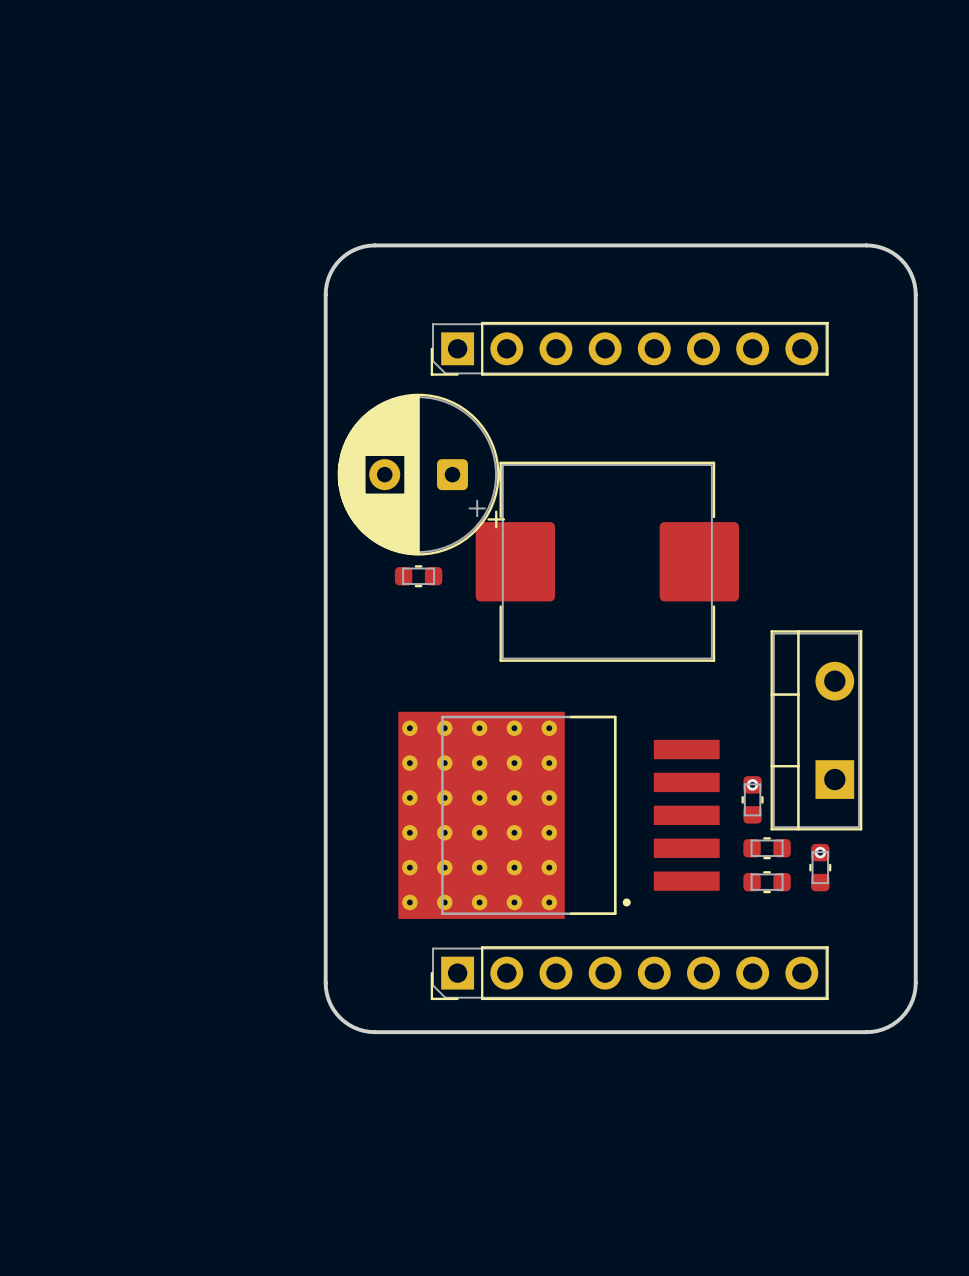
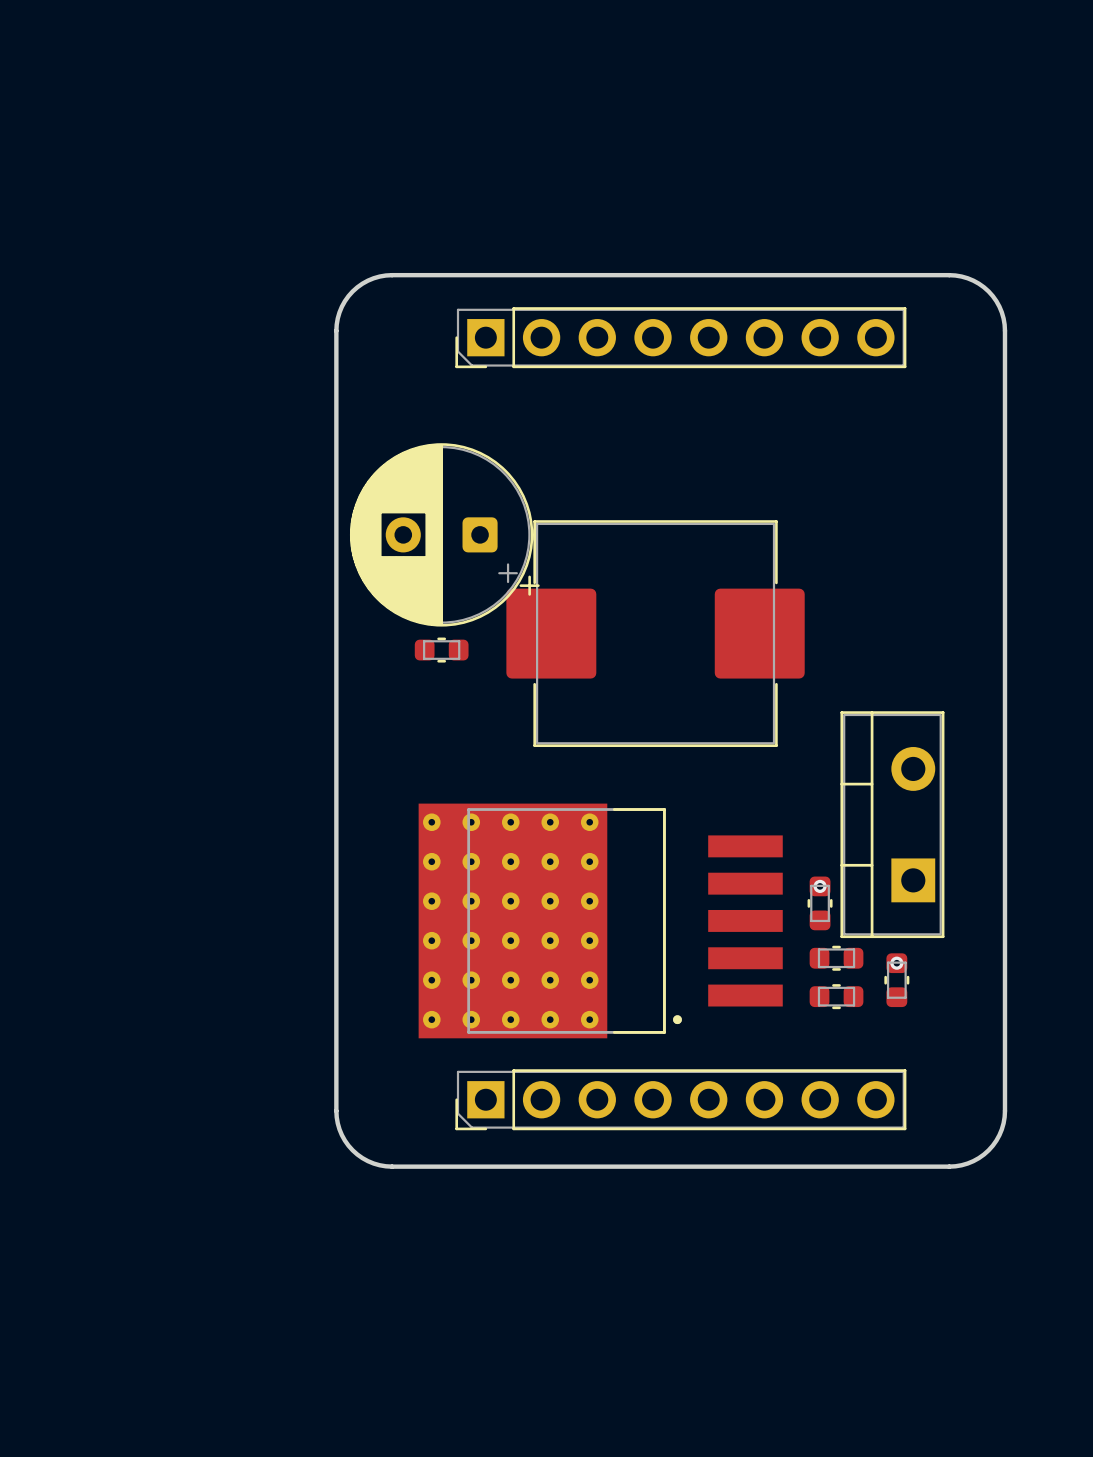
part position: (629, 348) -> (680, 337)

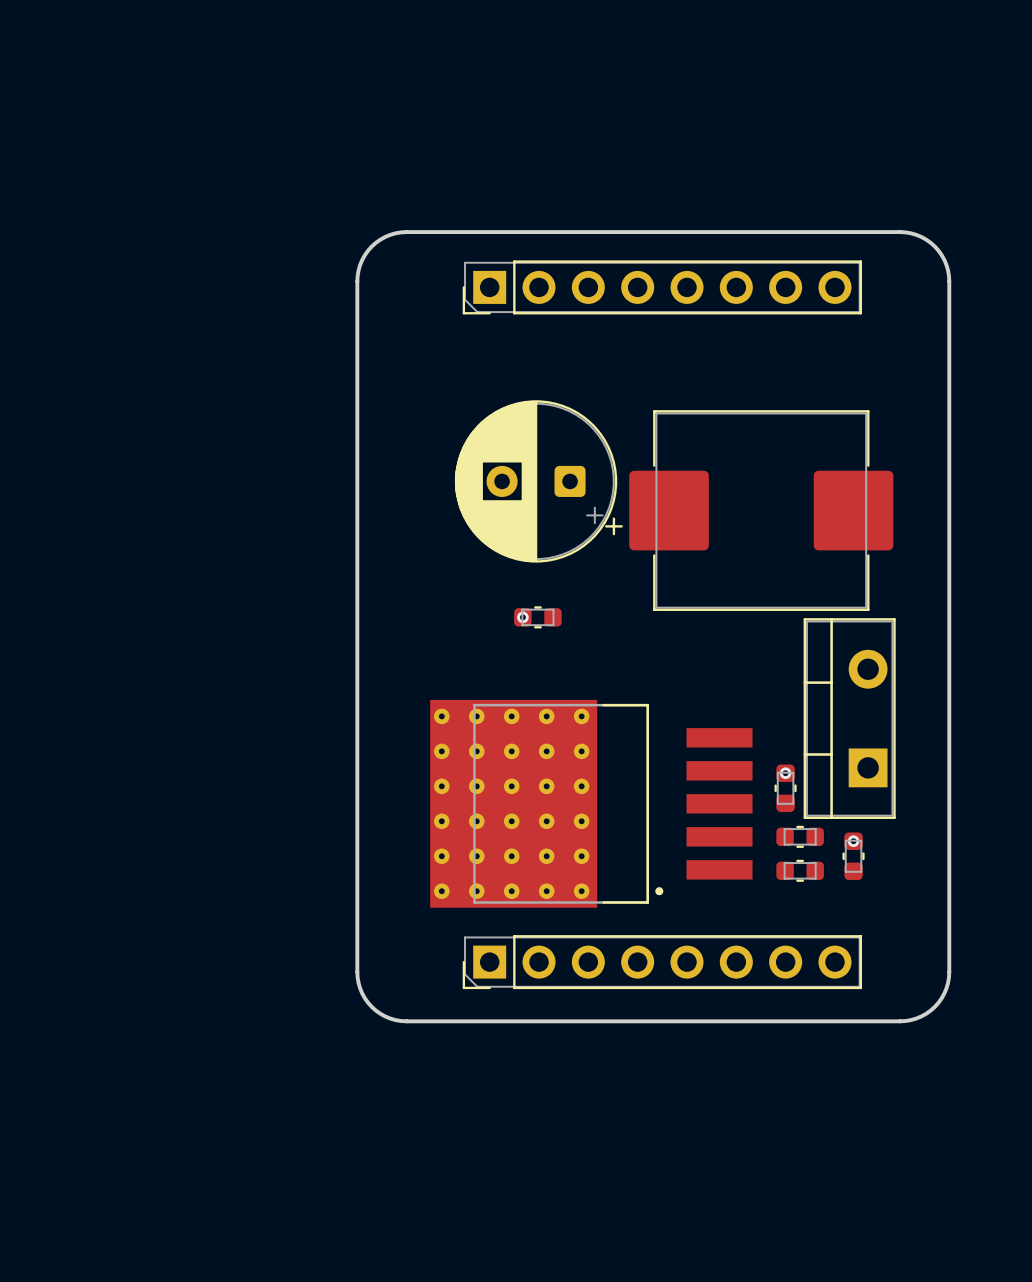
part position: (444, 534) -> (538, 481)
part position: (655, 633) -> (761, 510)
part position: (441, 650) -> (537, 617)
via: none -> (522, 617)

